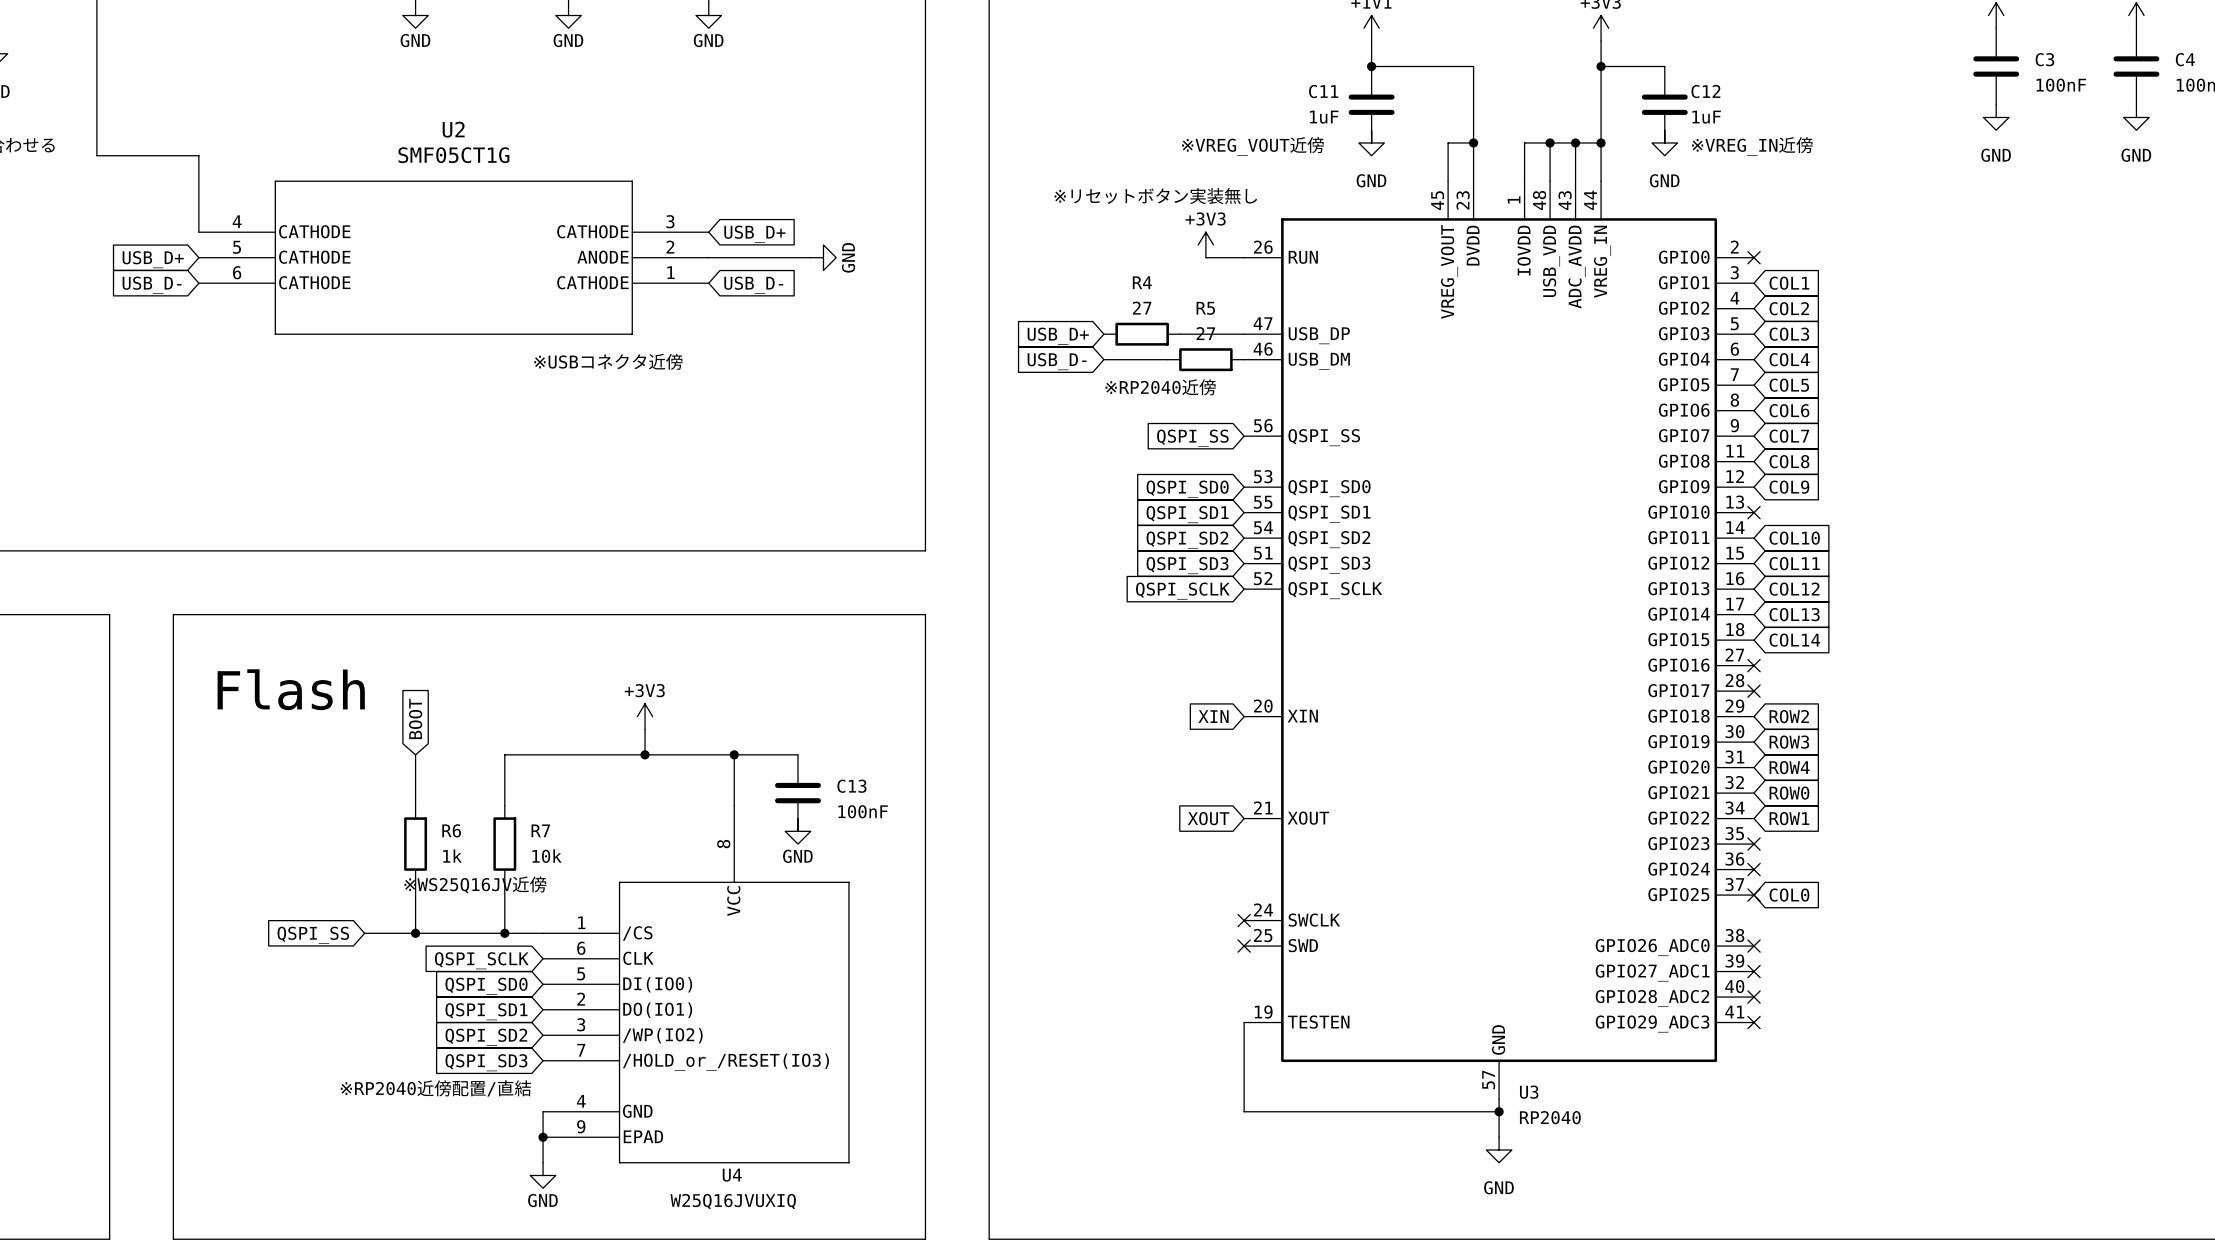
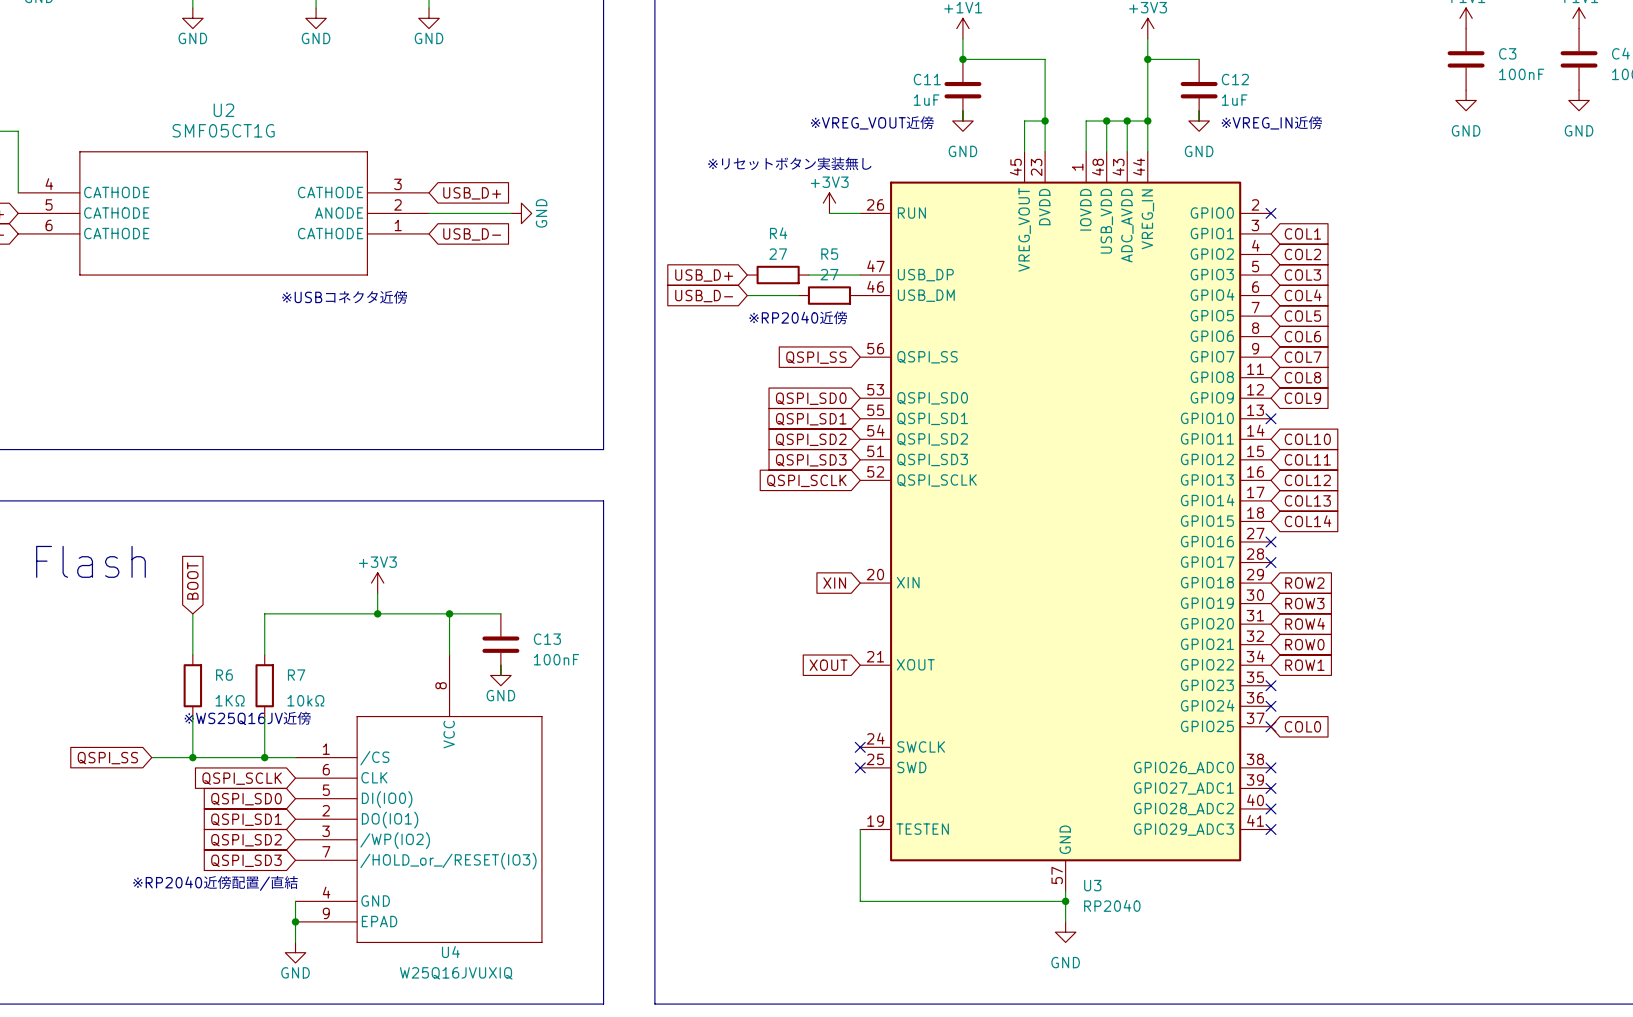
R6 value: 1k (452, 856) -> 1KΩ (230, 700)
R7 value: 10k (547, 856) -> 10kΩ (305, 700)

